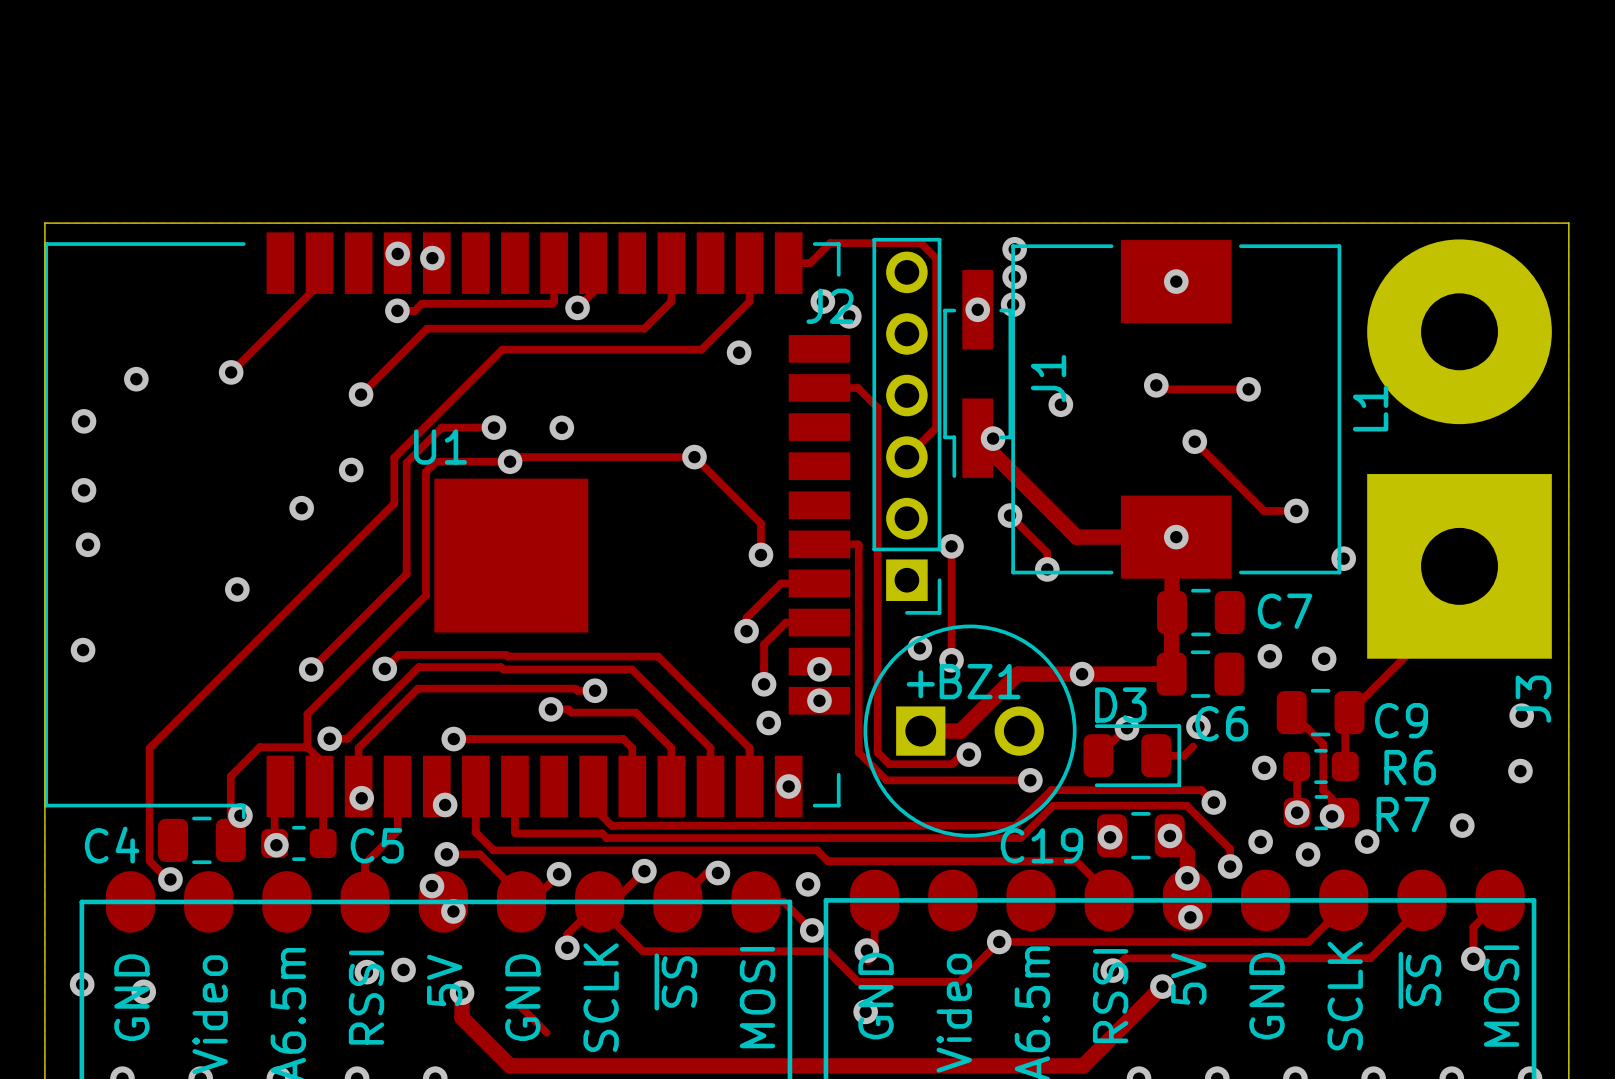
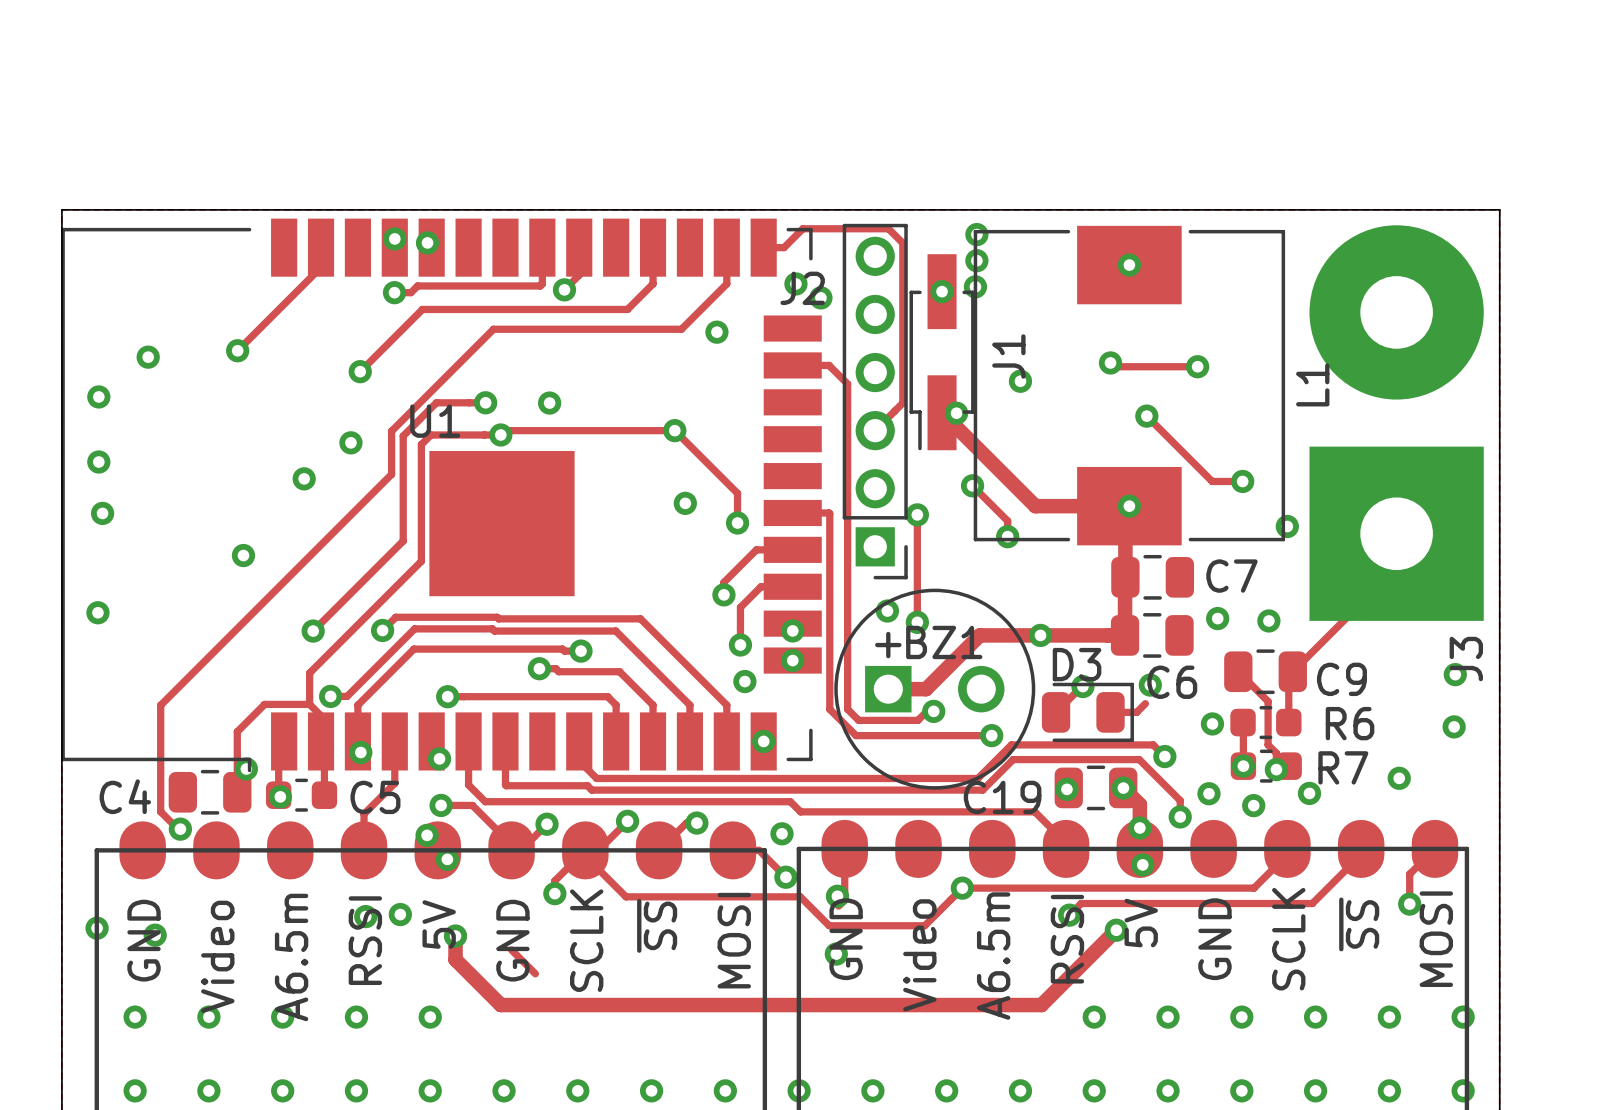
via: none -> (685, 503)

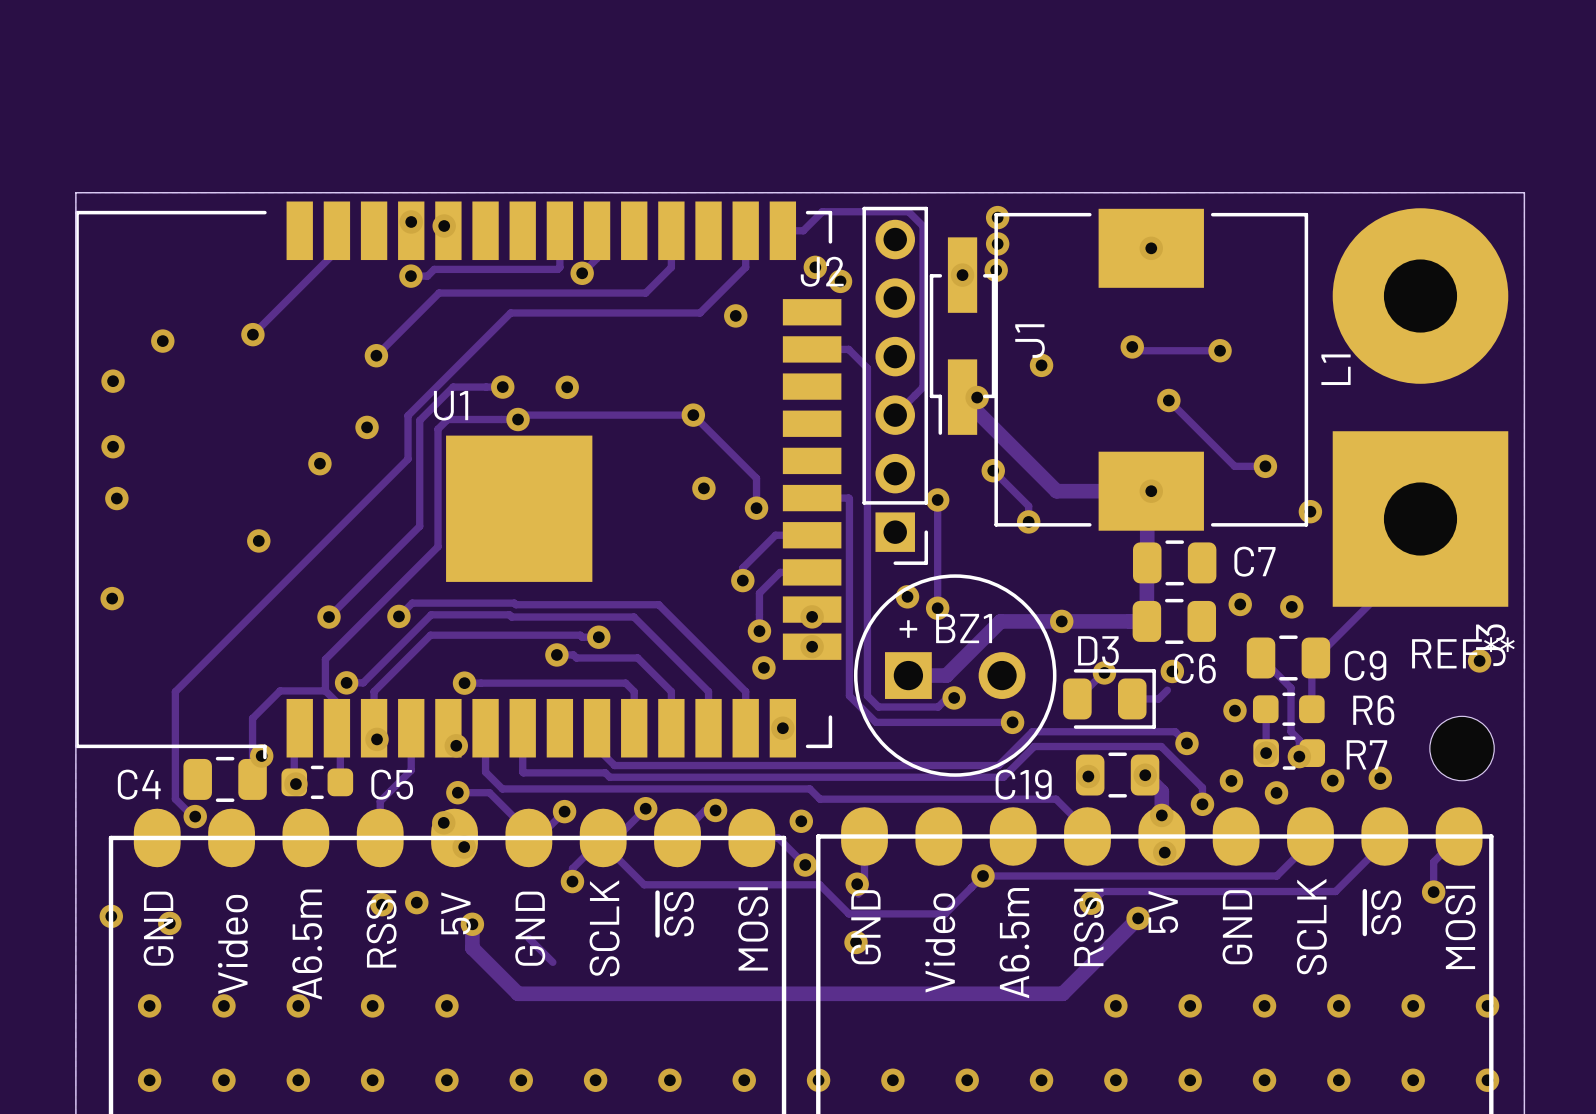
via: (1454, 726) -> none
REF**: none -> (1462, 748)
via position: (1399, 778) -> (1380, 778)

